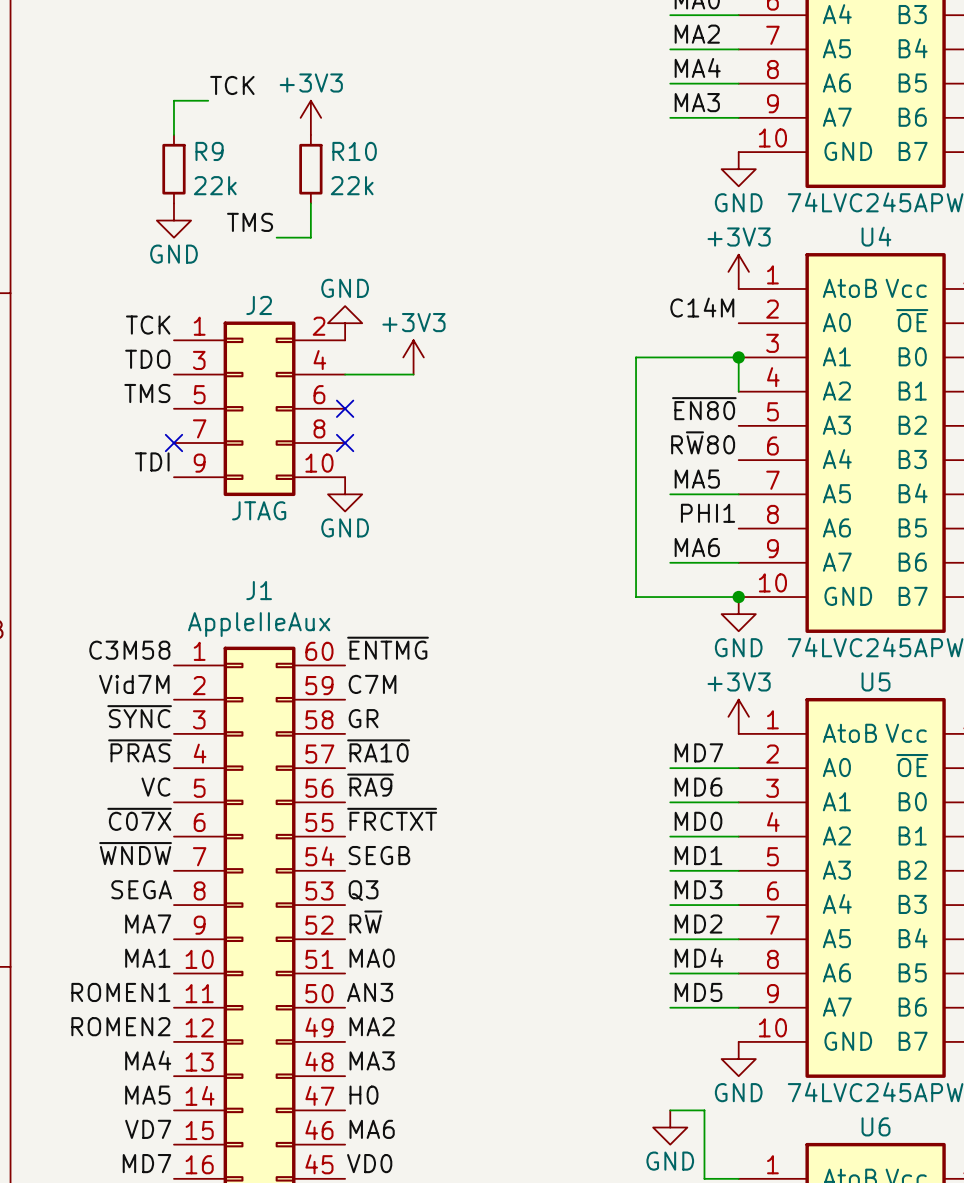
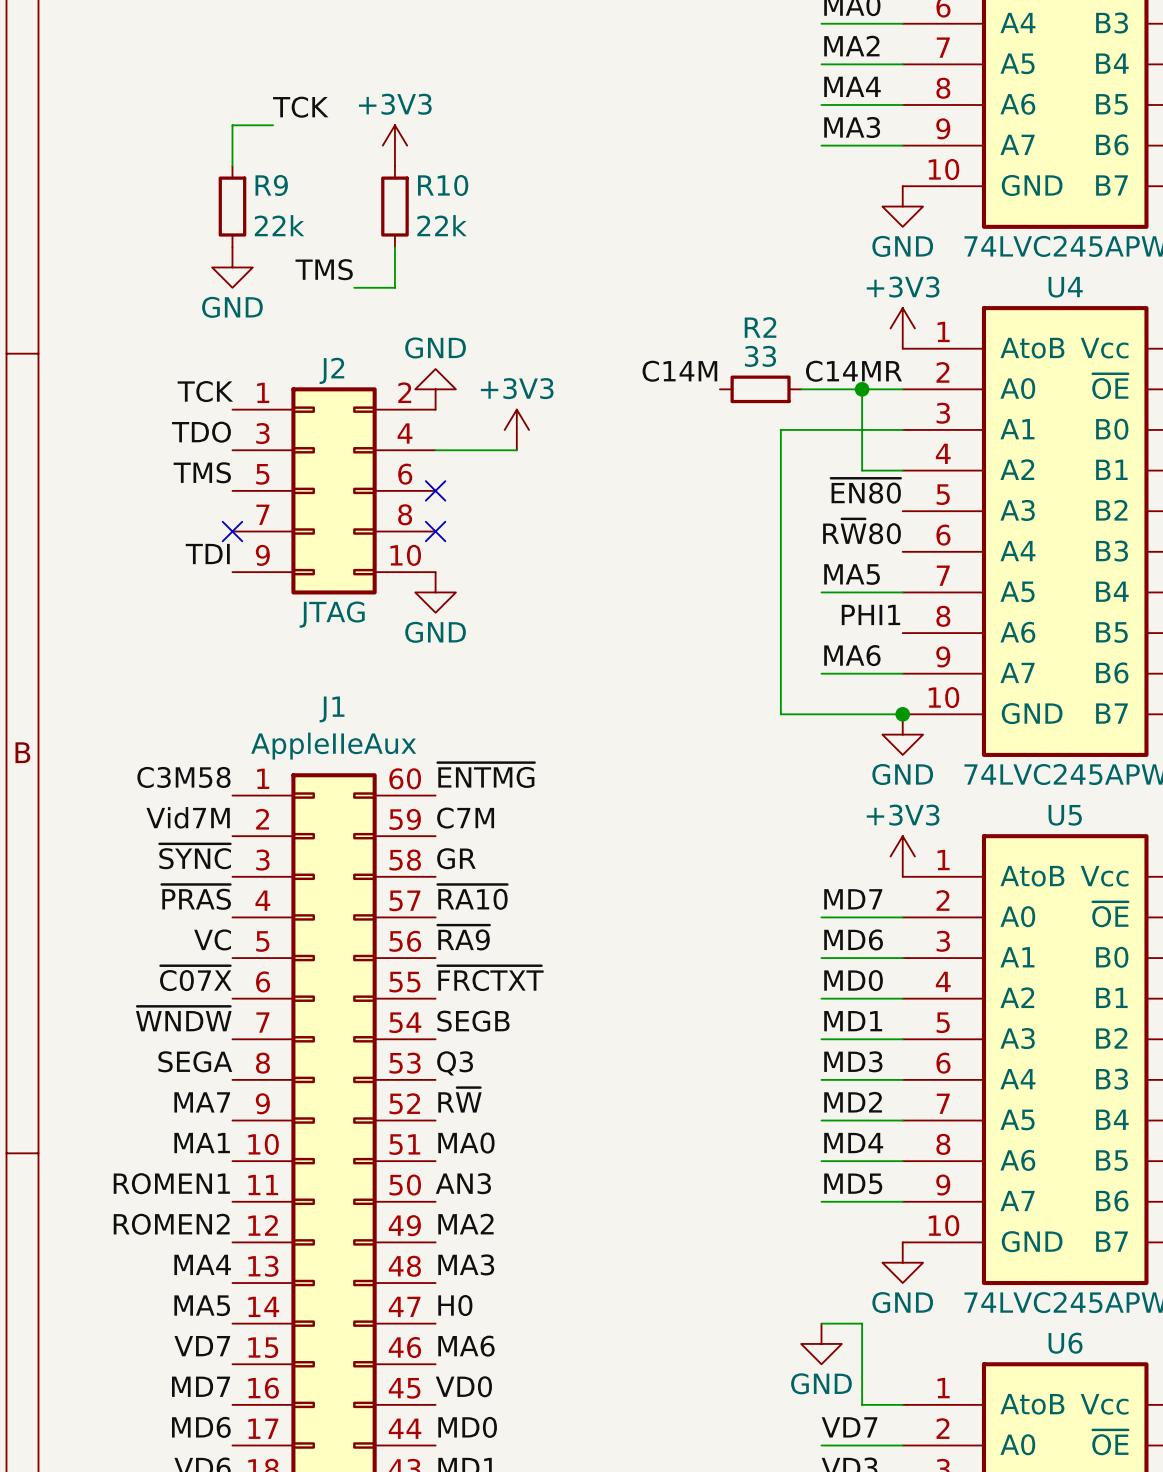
label: none -> C14M (679, 371)
label: C14M (702, 307) -> C14MR (853, 371)
R2: none -> 33 (760, 389)
wire: none -> (801, 389) (902, 389)
wire: (738, 357) (738, 391) -> (862, 389) (862, 470) (902, 470)
junction position: (738, 357) -> (862, 389)

